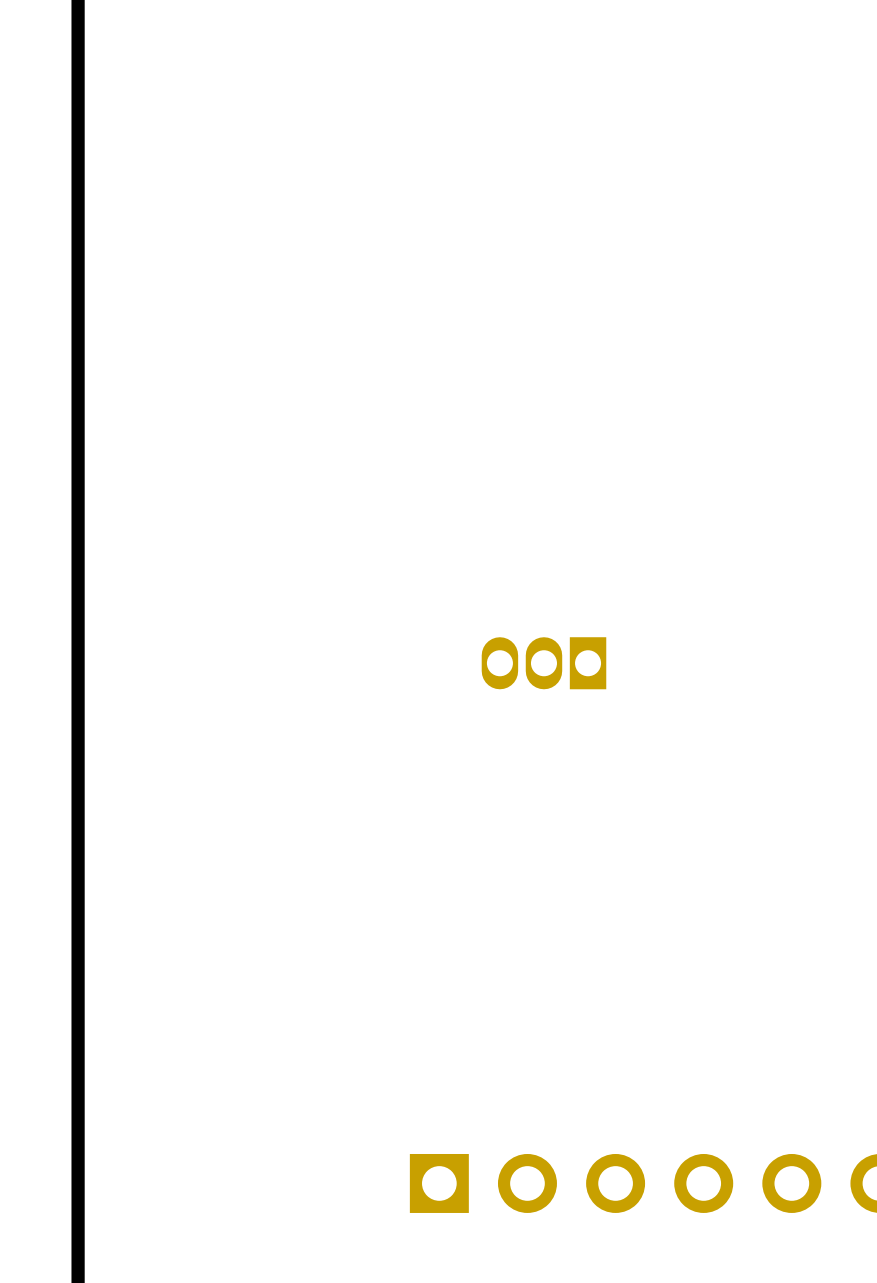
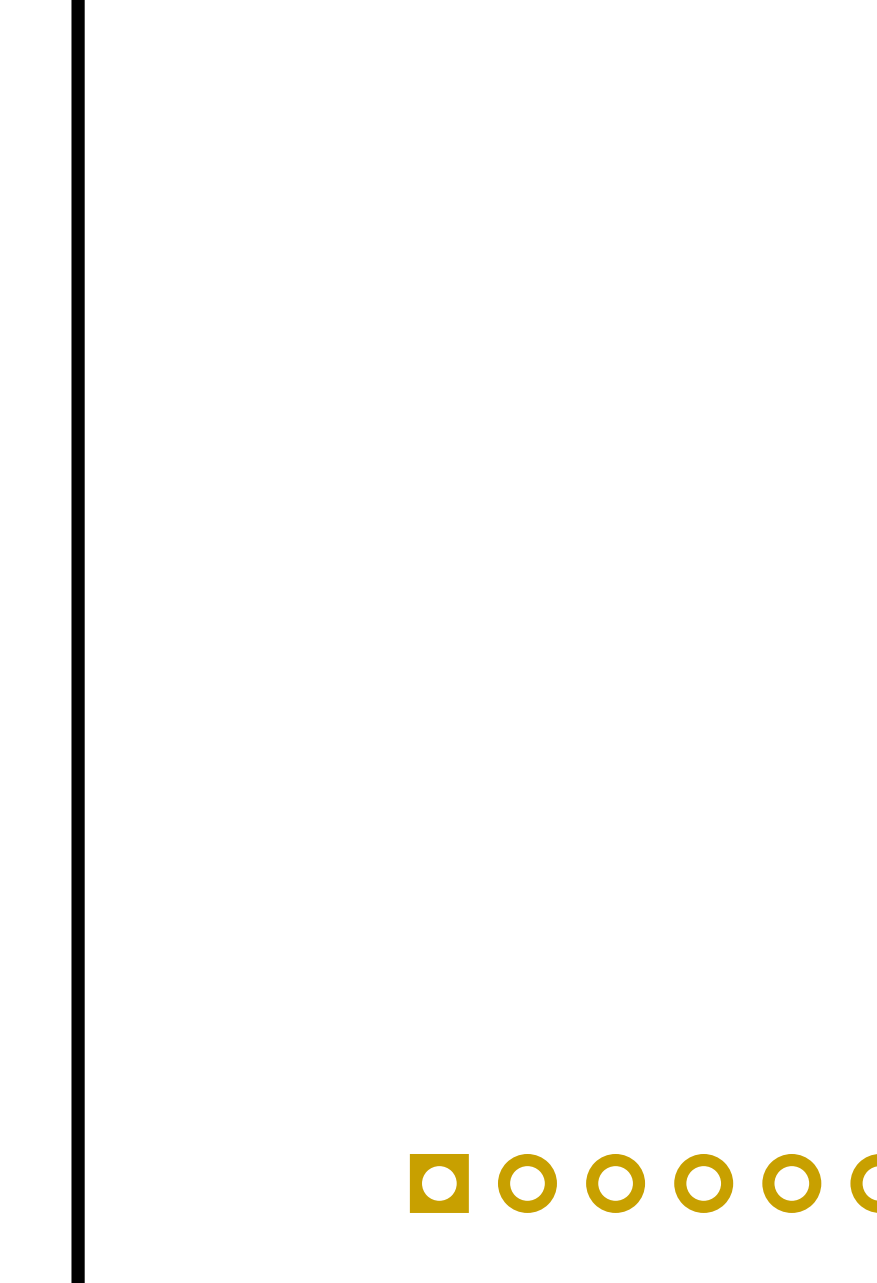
part: (543, 663) -> none

